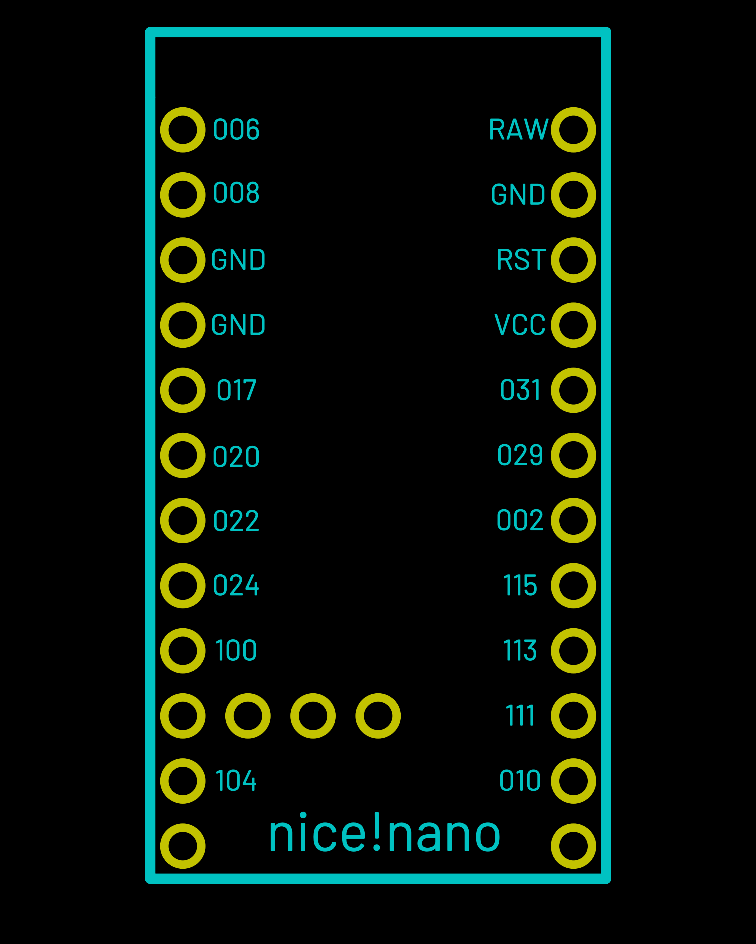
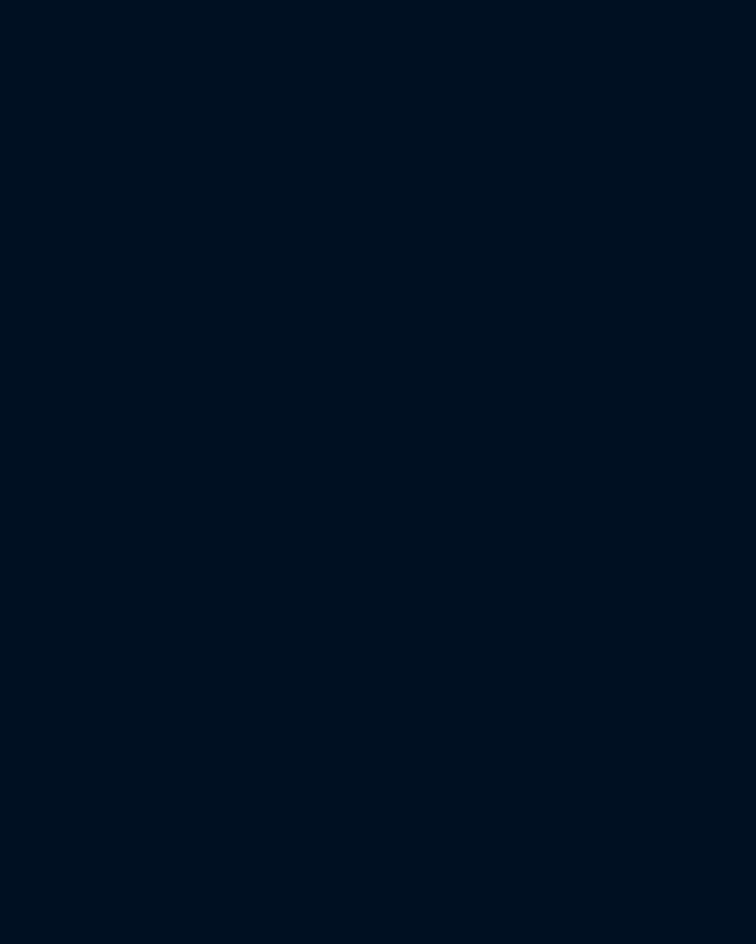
part: (378, 455) -> none
part: (378, 455) -> none

